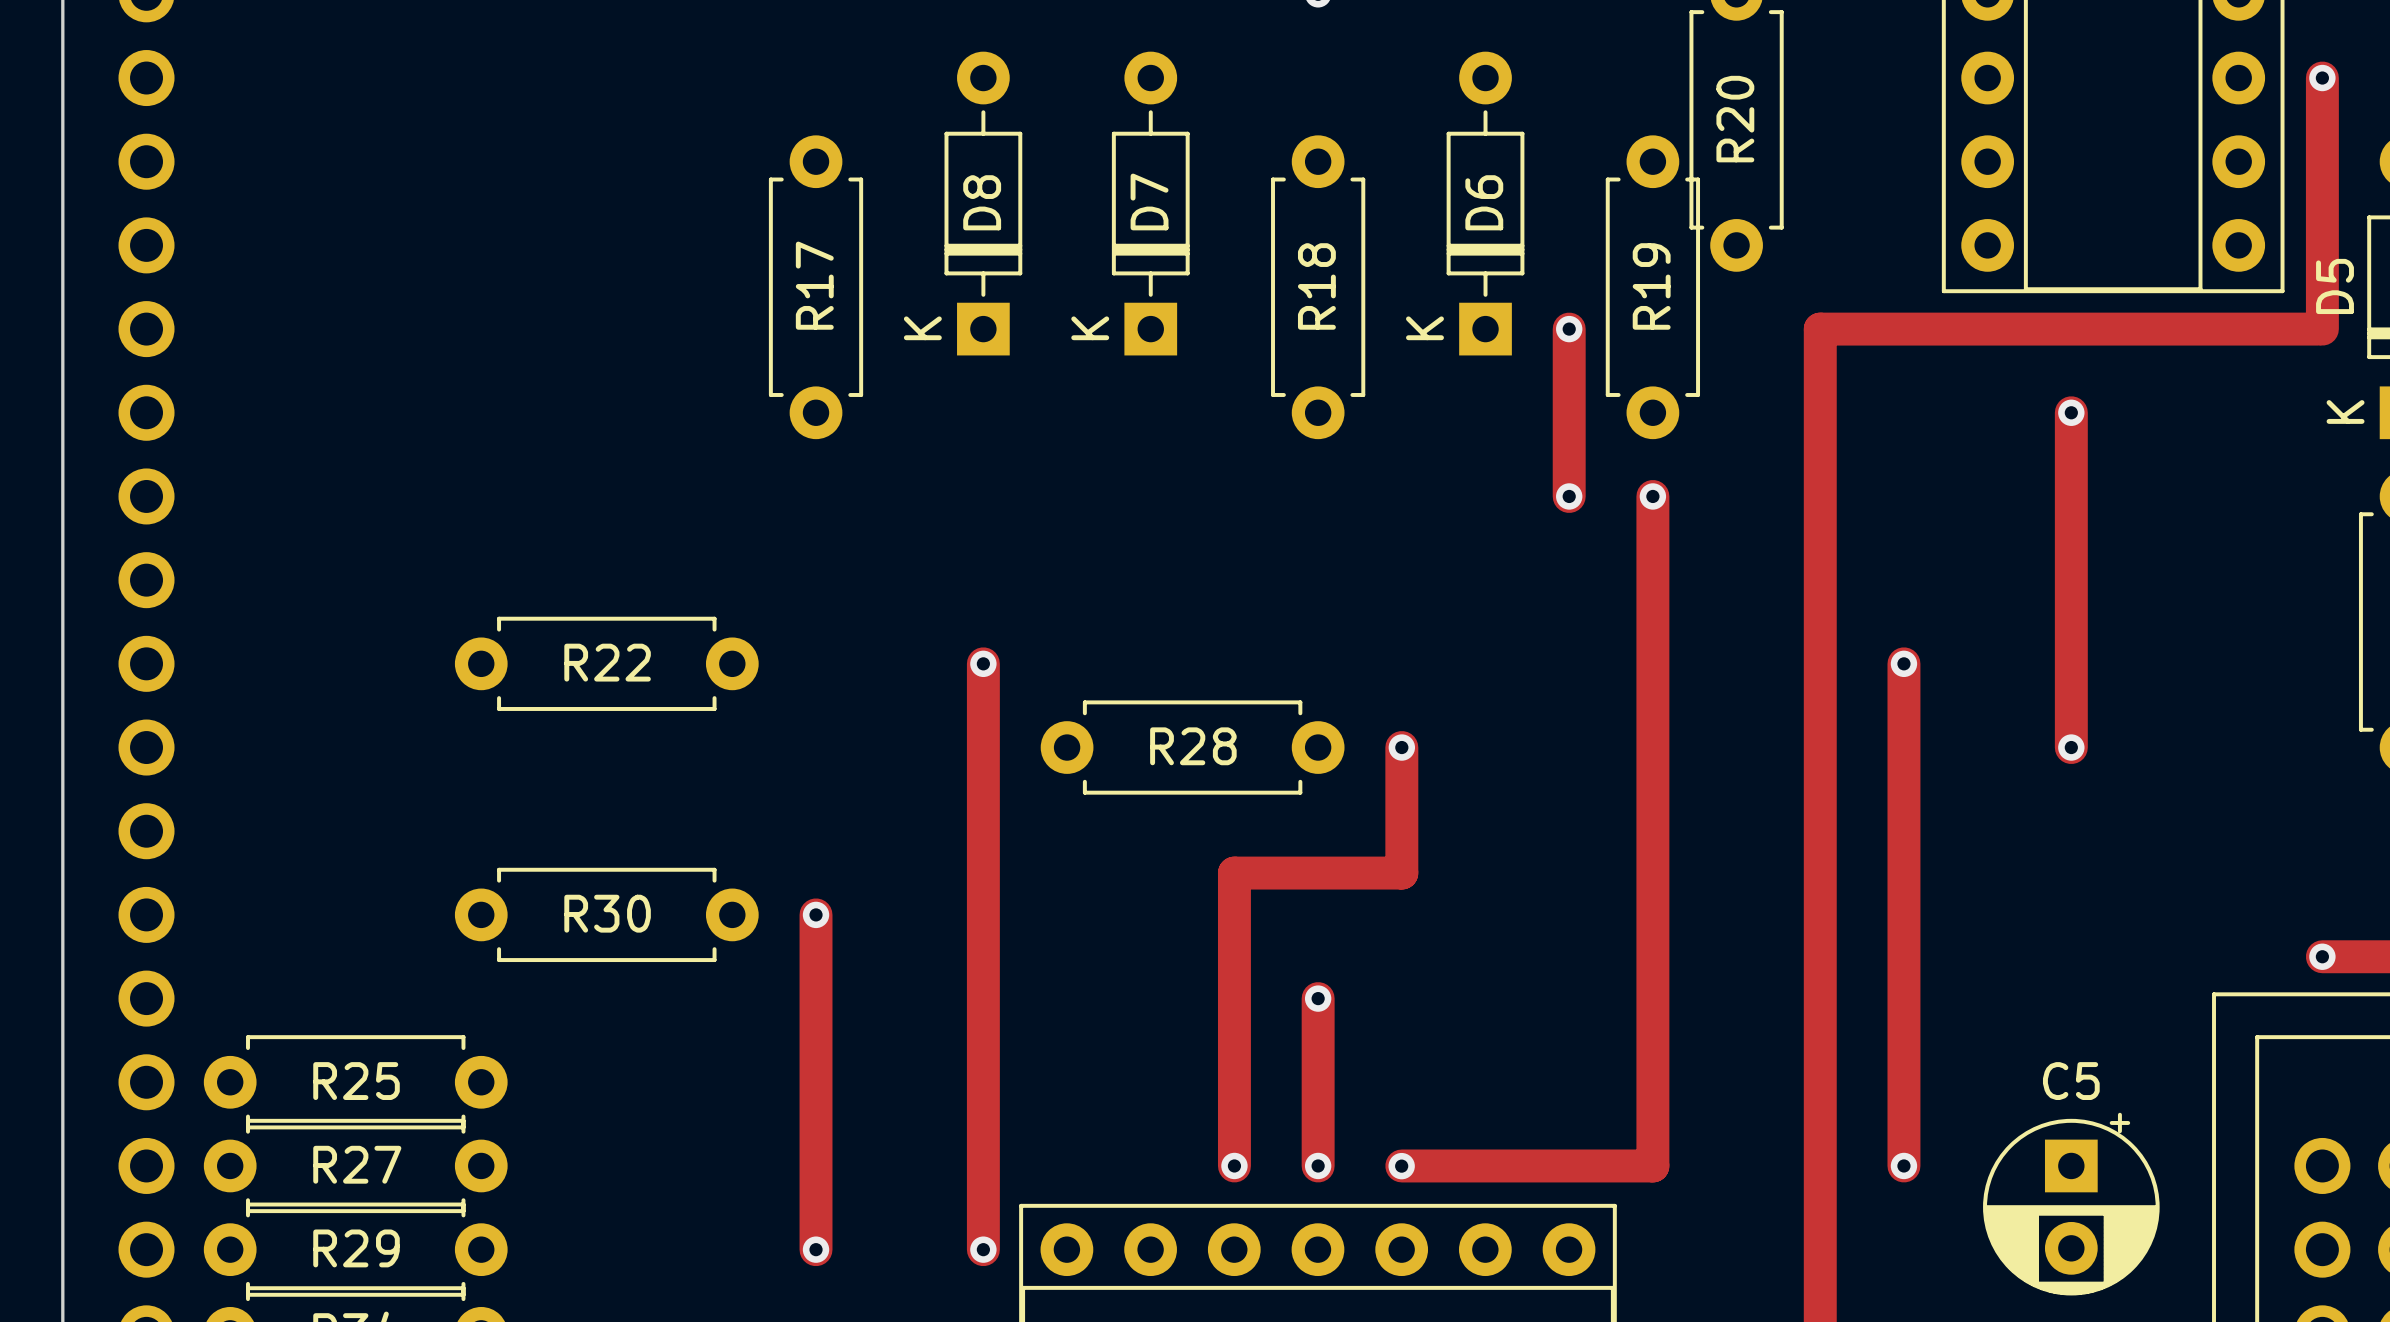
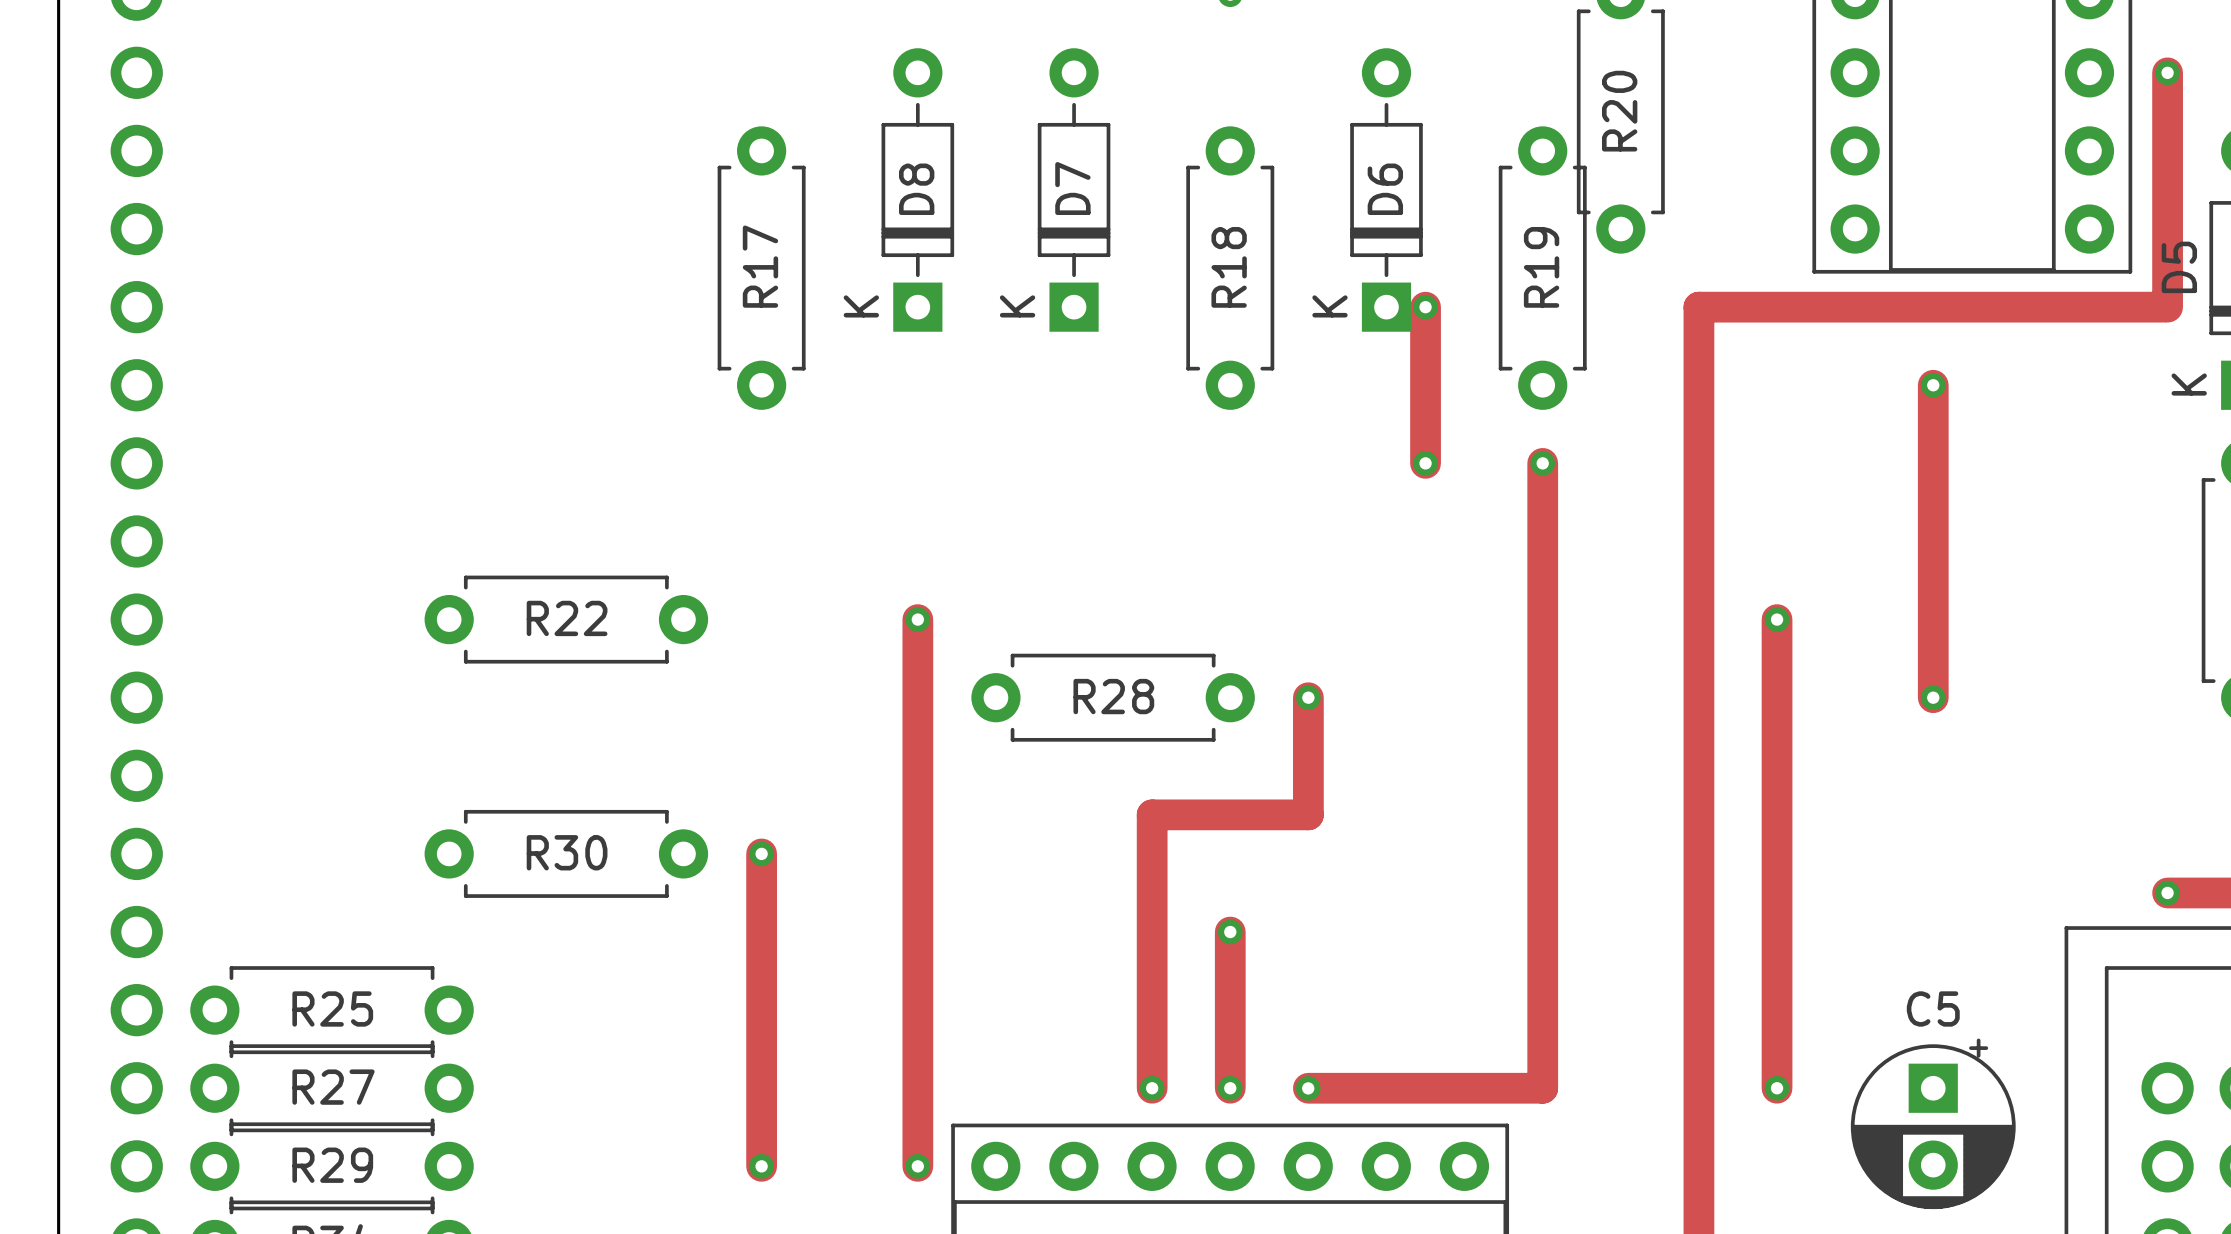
track: (1569, 329) (1569, 496) -> (1425, 307) (1425, 463)
via position: (1569, 329) -> (1425, 307)
via position: (1569, 496) -> (1425, 463)

